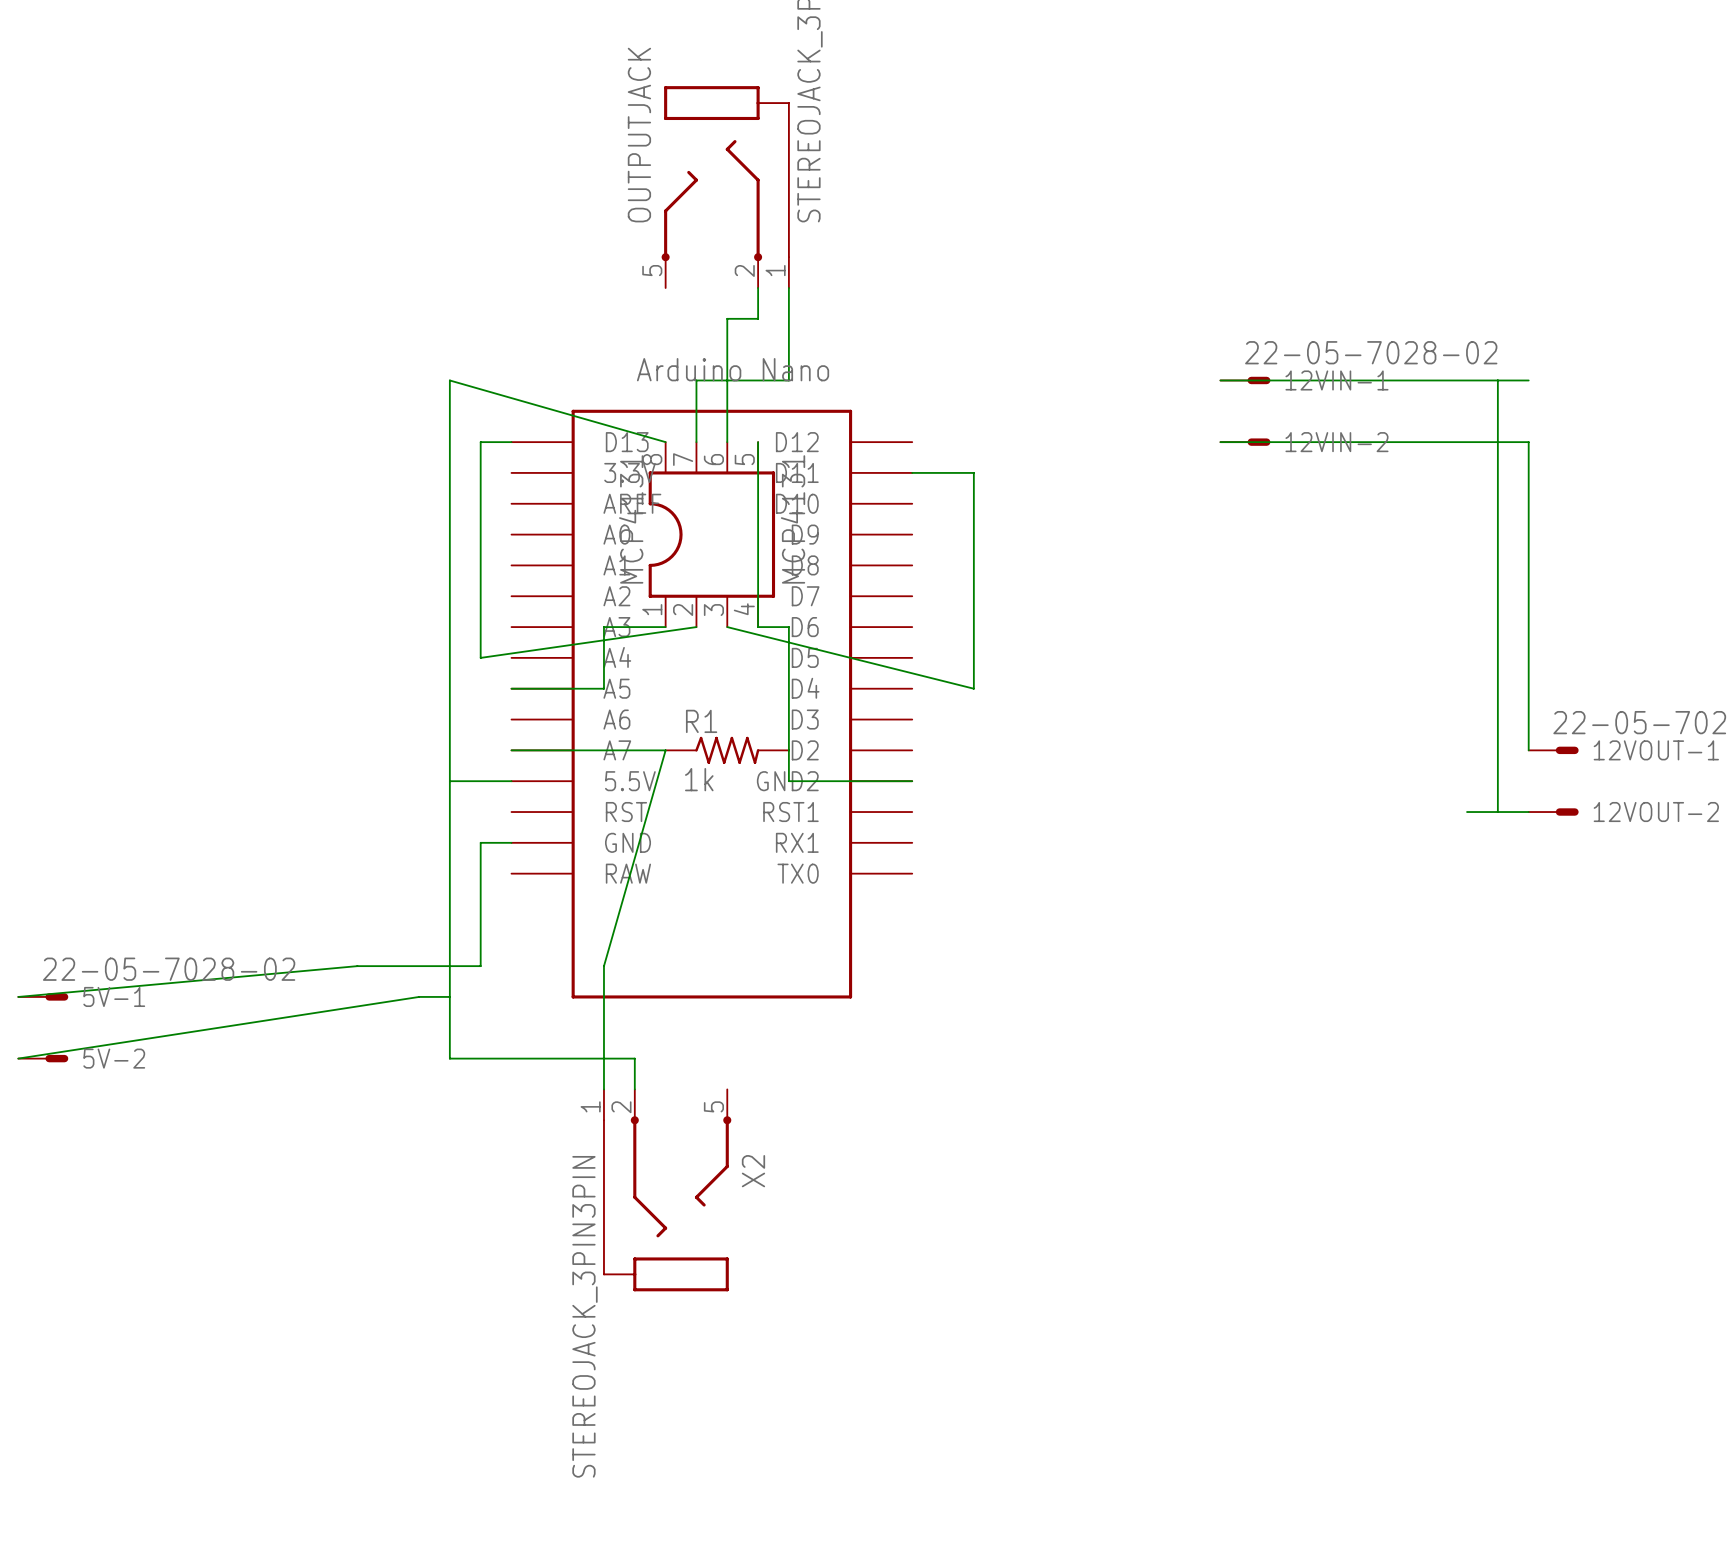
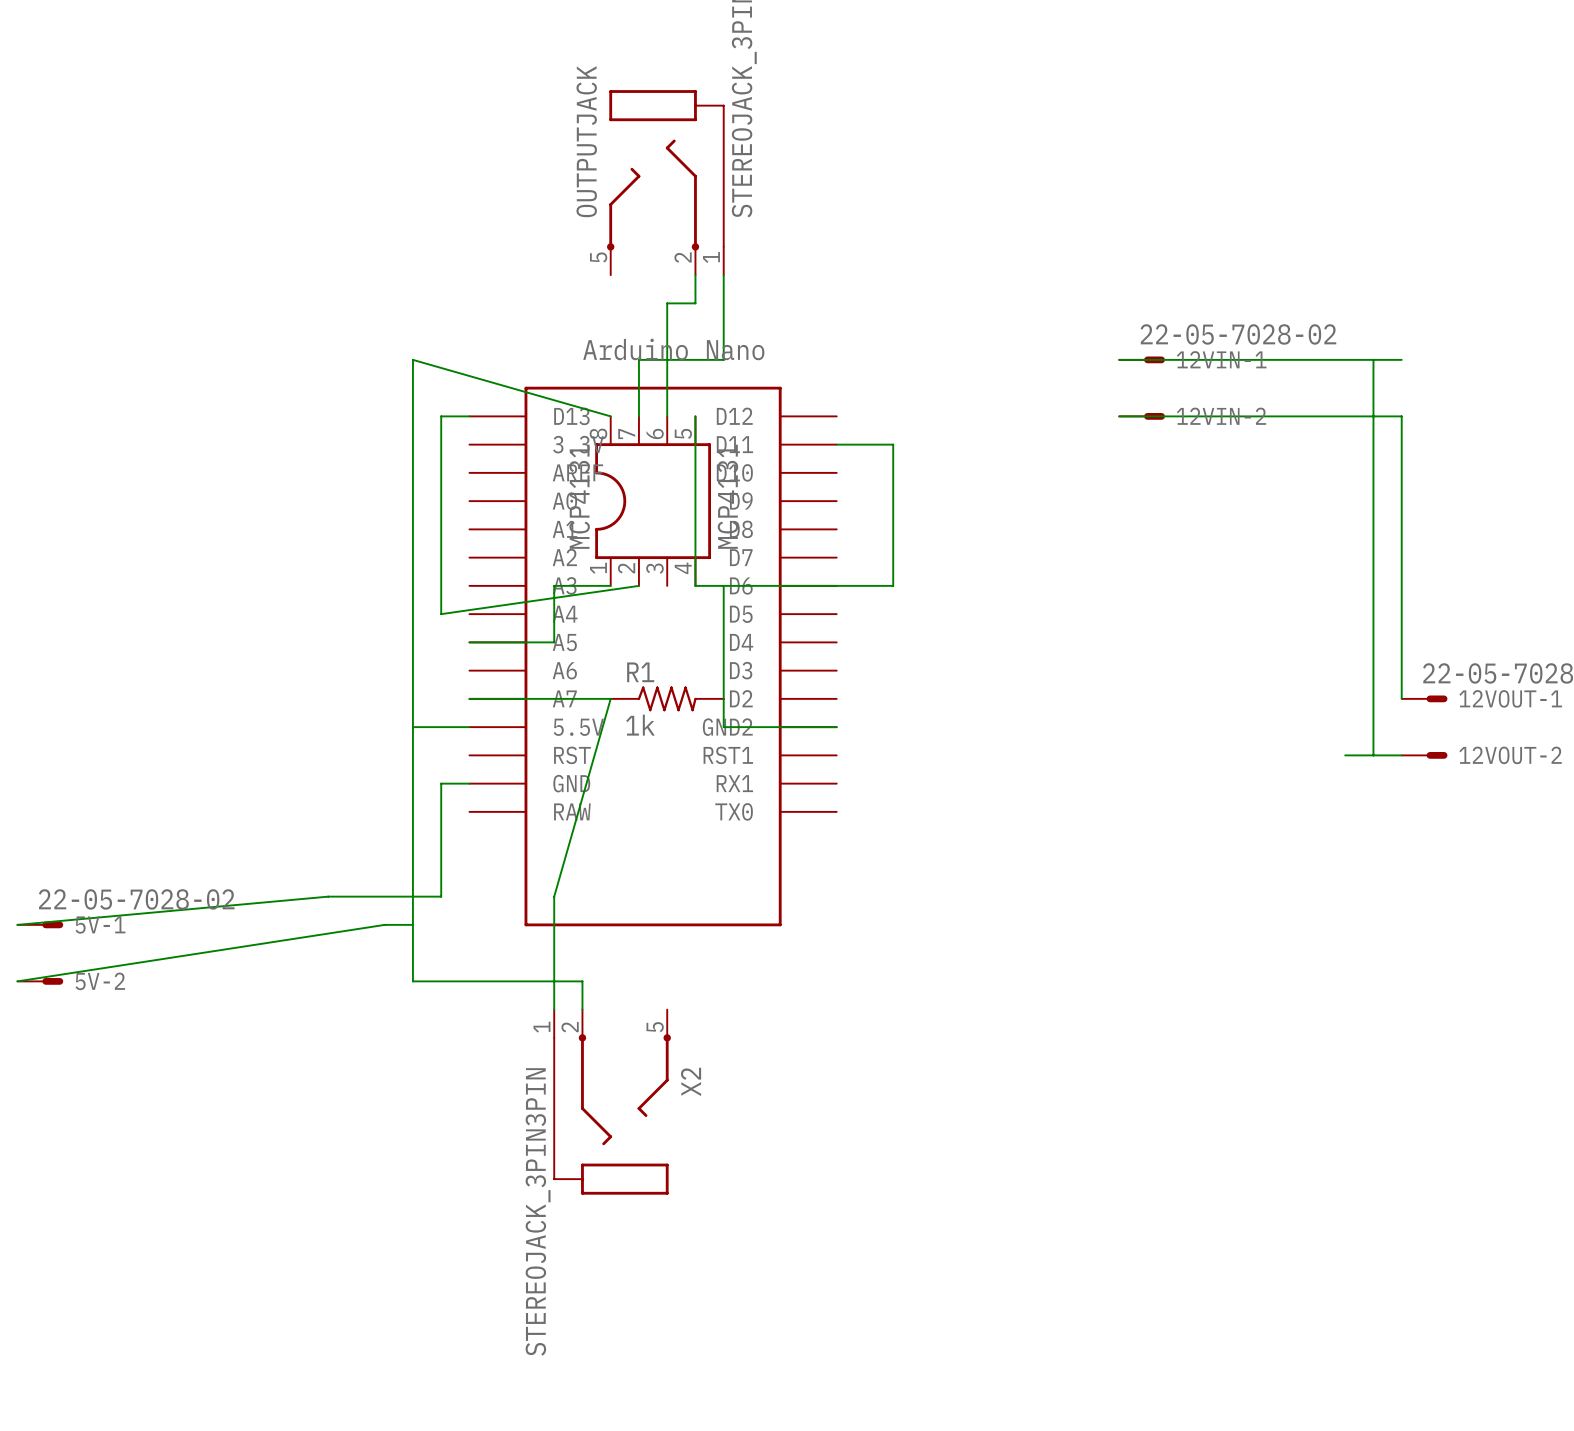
wire: (727, 627) (973, 688) (973, 627) -> (723, 585) (893, 585)

